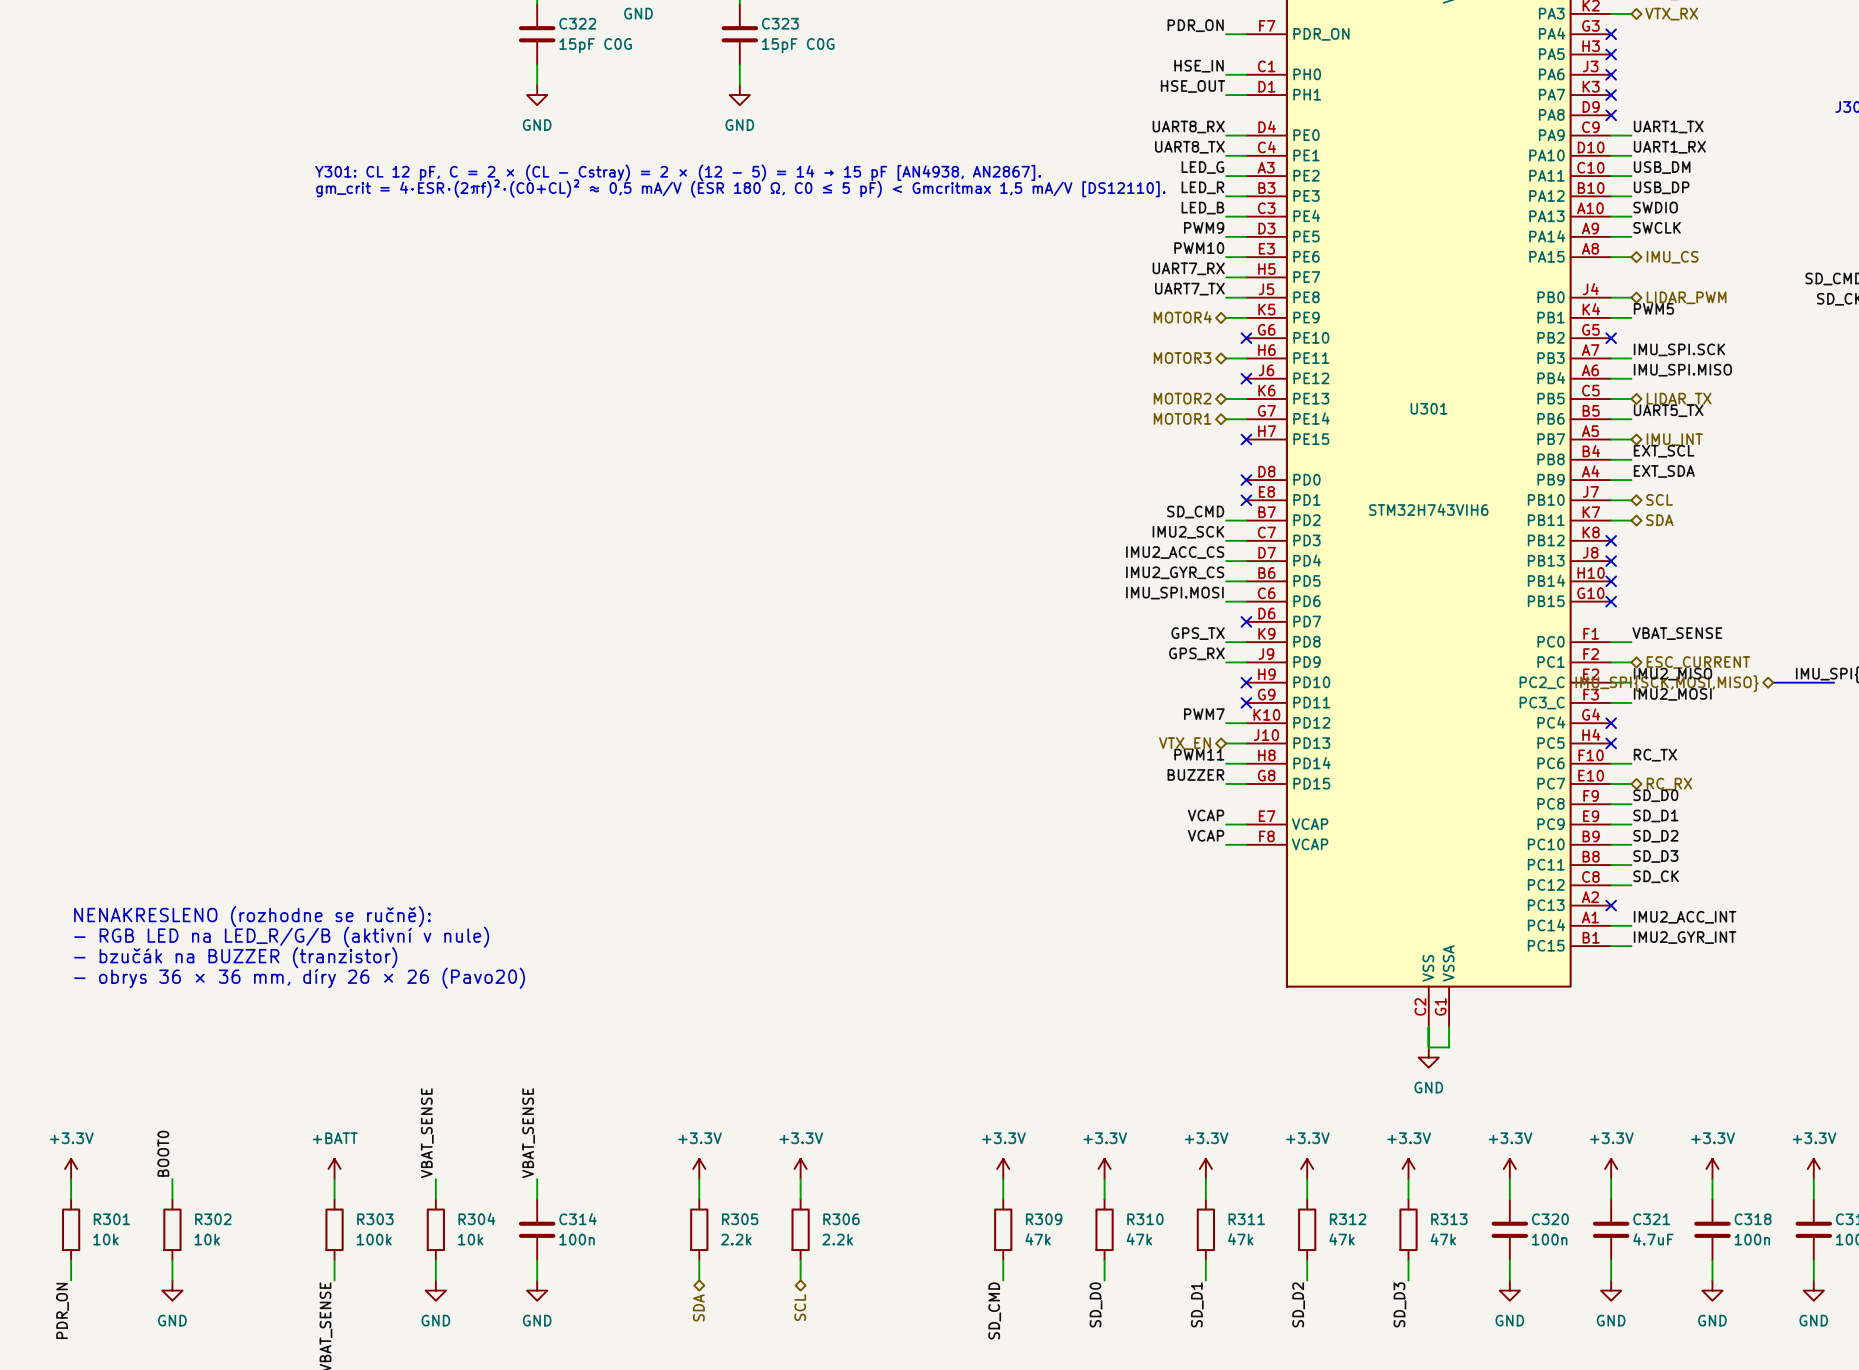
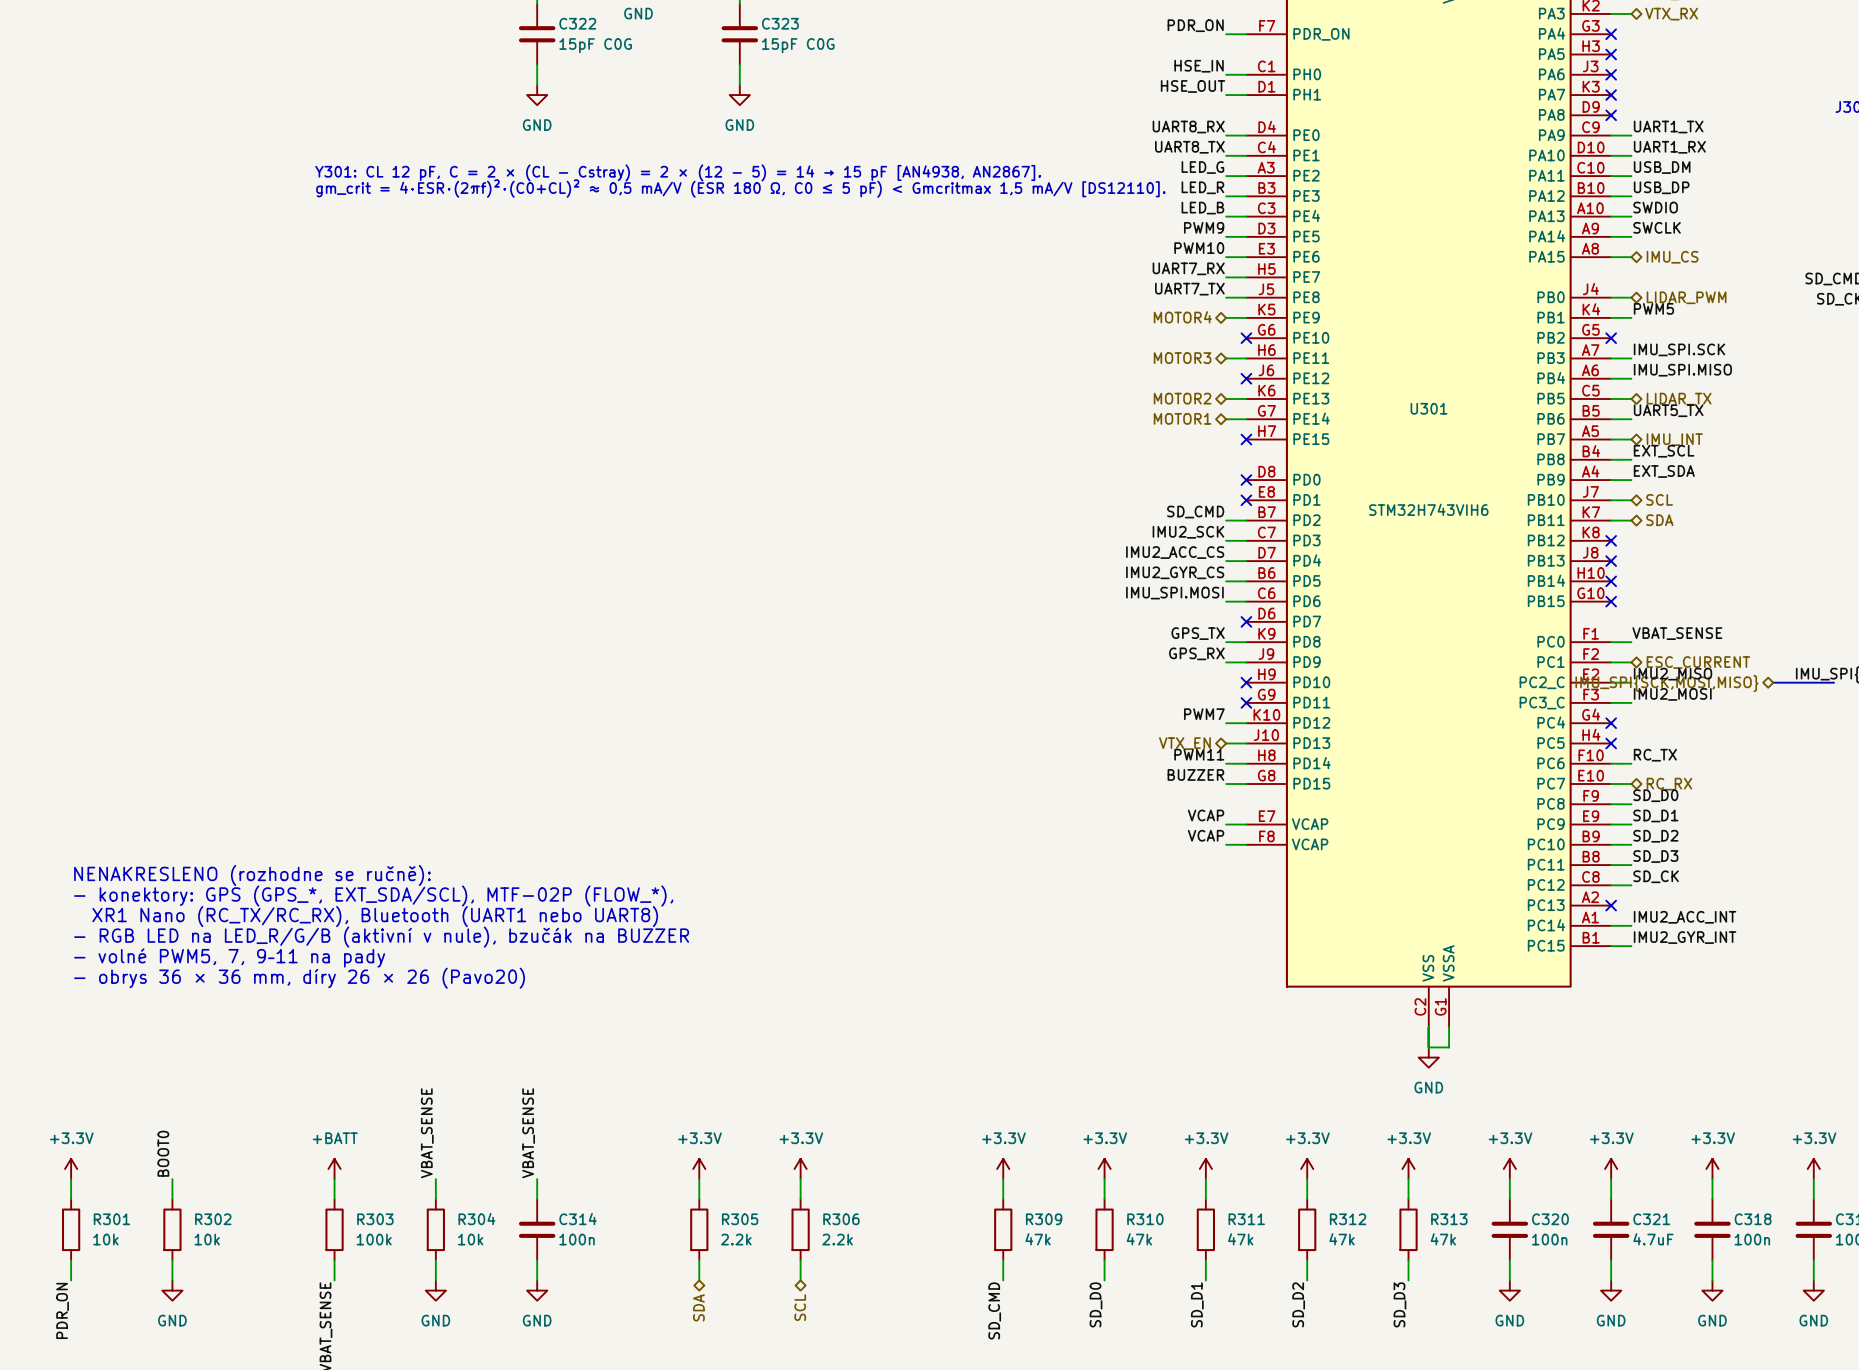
text: none -> NENAKRESLENO (rozhodne se ručně): (252, 875)
text: none -> - konektory: GPS (GPS_*, EXT_SDA/SCL), MTF-02P (FLOW_*), (373, 896)
text: NENAKRESLENO (rozhodne se ručně): (252, 916) -> XR1 Nano (RC_TX/RC_RX), Bluetooth (UART1 nebo UART8) (375, 916)
text: - RGB LED na LED_R/G/B (aktivní v nule) (281, 937) -> - RGB LED na LED_R/G/B (aktivní v nule), bzučák na BUZZER (381, 937)
text: - bzučák na BUZZER (tranzistor) (235, 957) -> - volné PWM5, 7, 9–11 na pady (229, 957)

